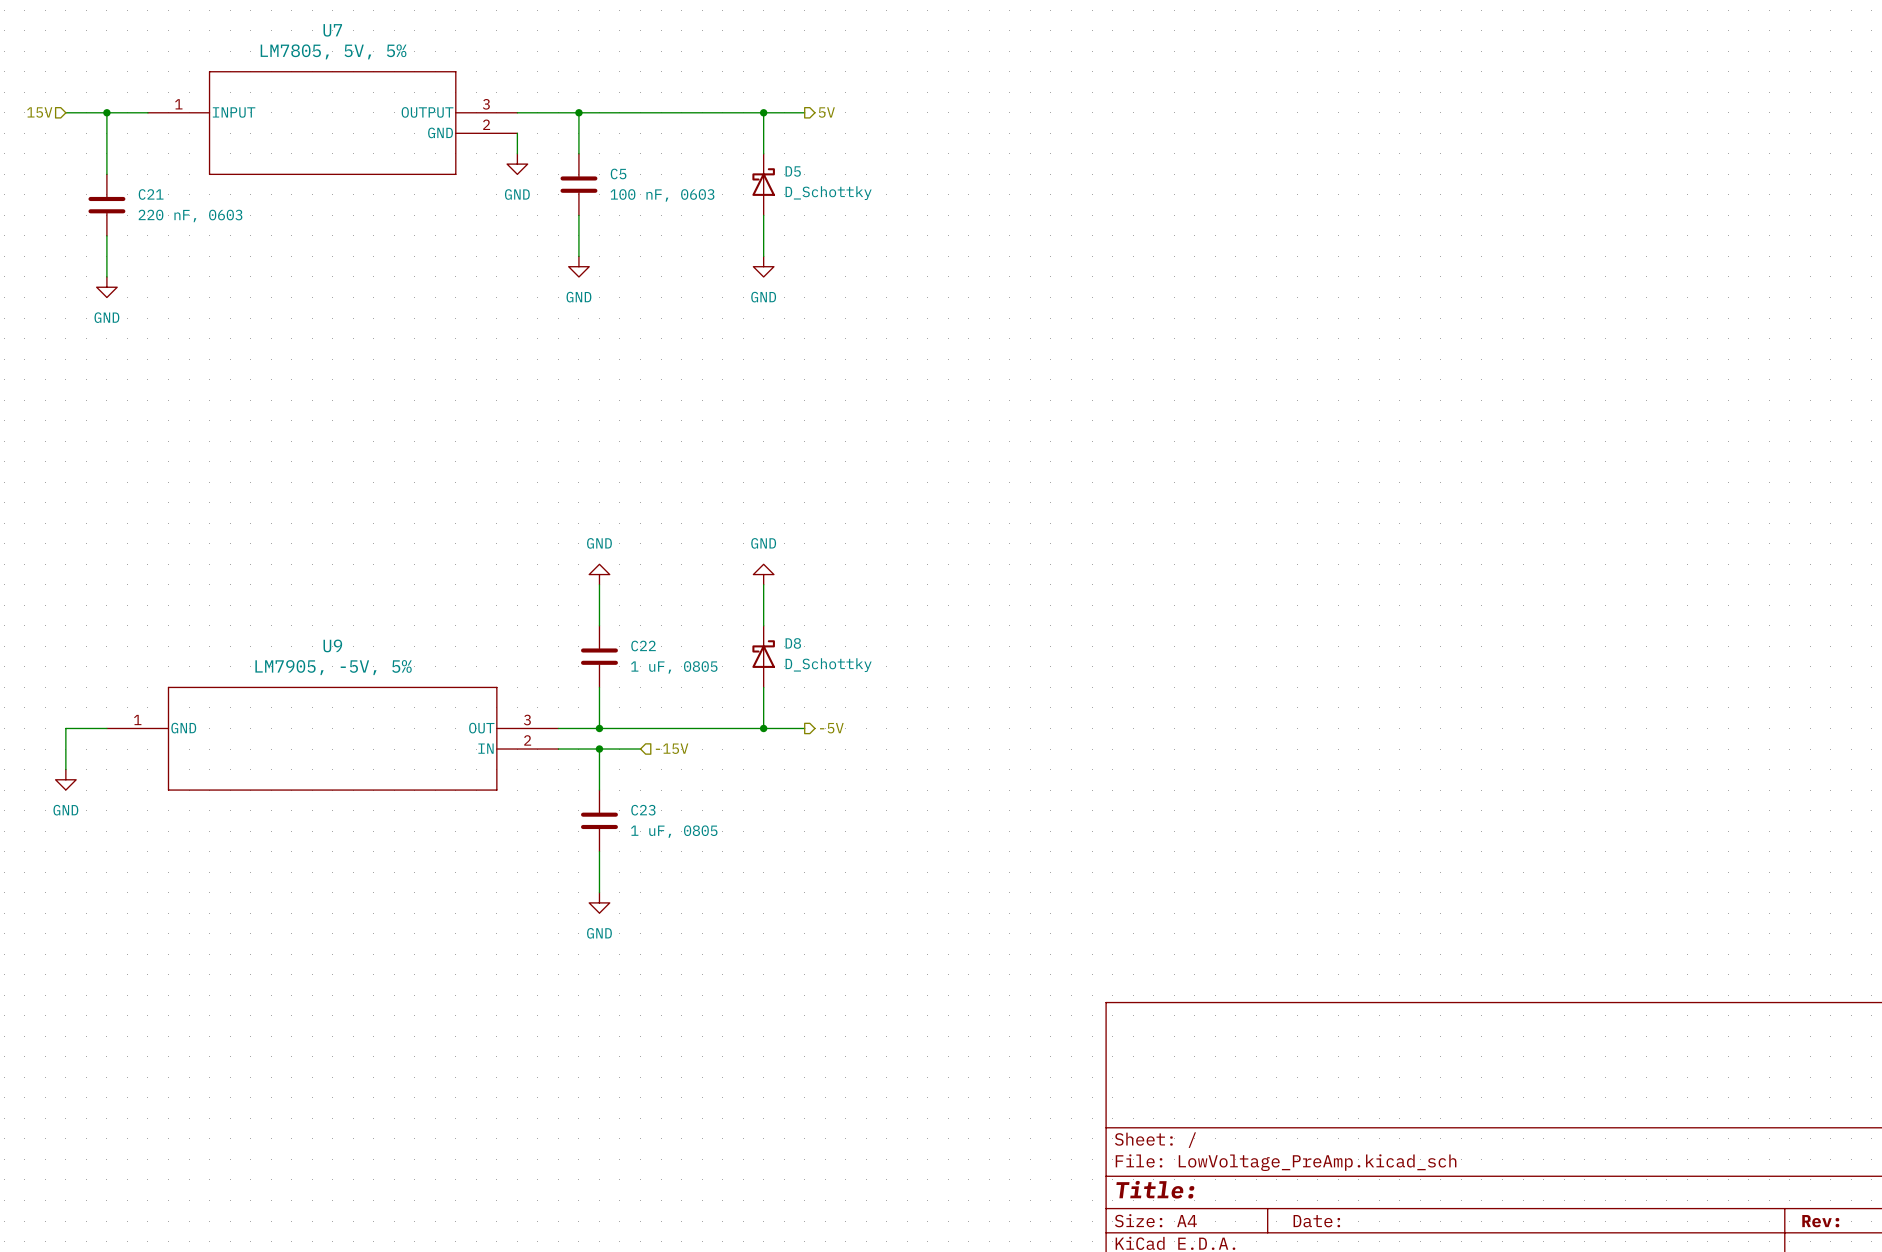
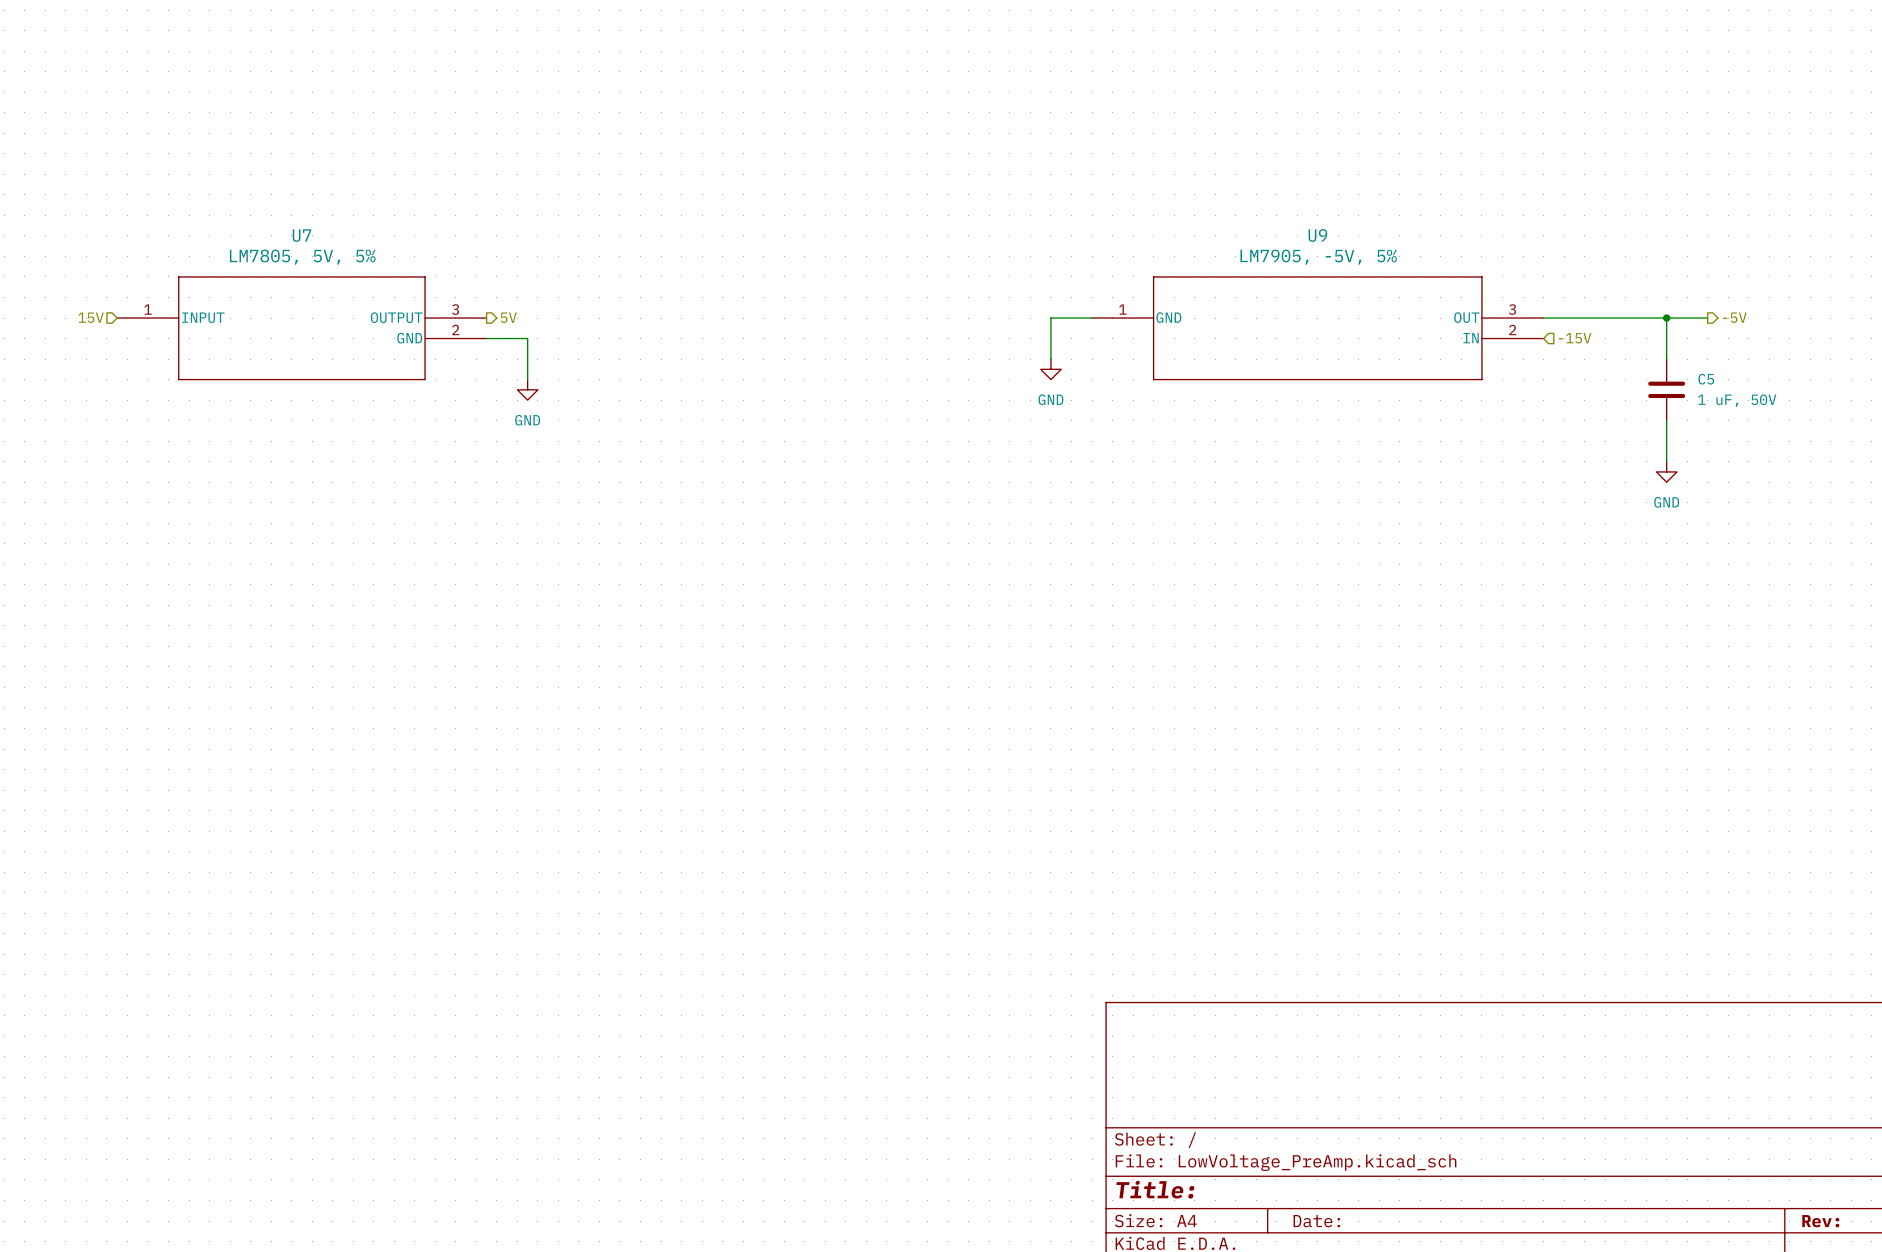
hierarchical label: 15V (39, 112) -> none
wire: (65, 112) (147, 112) -> none
wire: (106, 112) (106, 174) -> none
junction: (106, 112) -> none
wire: (517, 112) (804, 112) -> none
wire: (578, 112) (578, 153) -> none
junction: (578, 112) -> none
wire: (763, 112) (763, 153) -> none
junction: (763, 112) -> none
hierarchical label: 5V (826, 112) -> none
U7 position: (332, 123) -> (301, 328)
wire: (517, 133) (517, 153) -> none
power symbol: GND (517, 164) -> none
C5 position: (578, 184) -> (1666, 389)
D5: D_Schottky (763, 184) -> none
C5 value: 100 nF, 0603 (662, 195) -> 1 uF, 50V (1737, 400)
C21: 220 nF, 0603 (106, 205) -> none
wire: (578, 215) (578, 256) -> none
wire: (763, 215) (763, 256) -> none
wire: (106, 235) (106, 276) -> none
power symbol: GND (578, 266) -> none
power symbol: GND (763, 266) -> none
power symbol: GND (106, 287) -> none
hierarchical label: none -> 15V (91, 317)
hierarchical label: none -> 5V (508, 317)
hierarchical label: none -> -5V (1734, 317)
wire: none -> (1092, 318) (1050, 318) (1050, 359)
wire: none -> (1543, 318) (1707, 318)
wire: none -> (1666, 318) (1666, 359)
junction: none -> (1666, 318)
wire: none -> (486, 338) (527, 338) (527, 379)
hierarchical label: none -> -15V (1575, 338)
power symbol: none -> GND (1050, 369)
power symbol: none -> GND (527, 389)
wire: none -> (1666, 420) (1666, 461)
power symbol: none -> GND (1666, 471)
power symbol: GND (599, 574) -> none
power symbol: GND (763, 574) -> none
wire: (599, 584) (599, 625) -> none
wire: (763, 584) (763, 625) -> none
C22: 1 uF, 0805 (599, 656) -> none
D8: D_Schottky (763, 656) -> none
wire: (599, 687) (599, 728) -> none
wire: (763, 687) (763, 728) -> none
wire: (106, 728) (65, 728) (65, 769) -> none
wire: (558, 728) (804, 728) -> none
junction: (599, 728) -> none
junction: (763, 728) -> none
hierarchical label: -5V (831, 728) -> none
U9 position: (332, 738) -> (1317, 328)
hierarchical label: -15V (672, 748) -> none
wire: (558, 749) (640, 749) -> none
wire: (599, 749) (599, 790) -> none
junction: (599, 749) -> none
power symbol: GND (65, 779) -> none
C23: 1 uF, 0805 (599, 820) -> none
wire: (599, 851) (599, 892) -> none
power symbol: GND (599, 902) -> none

